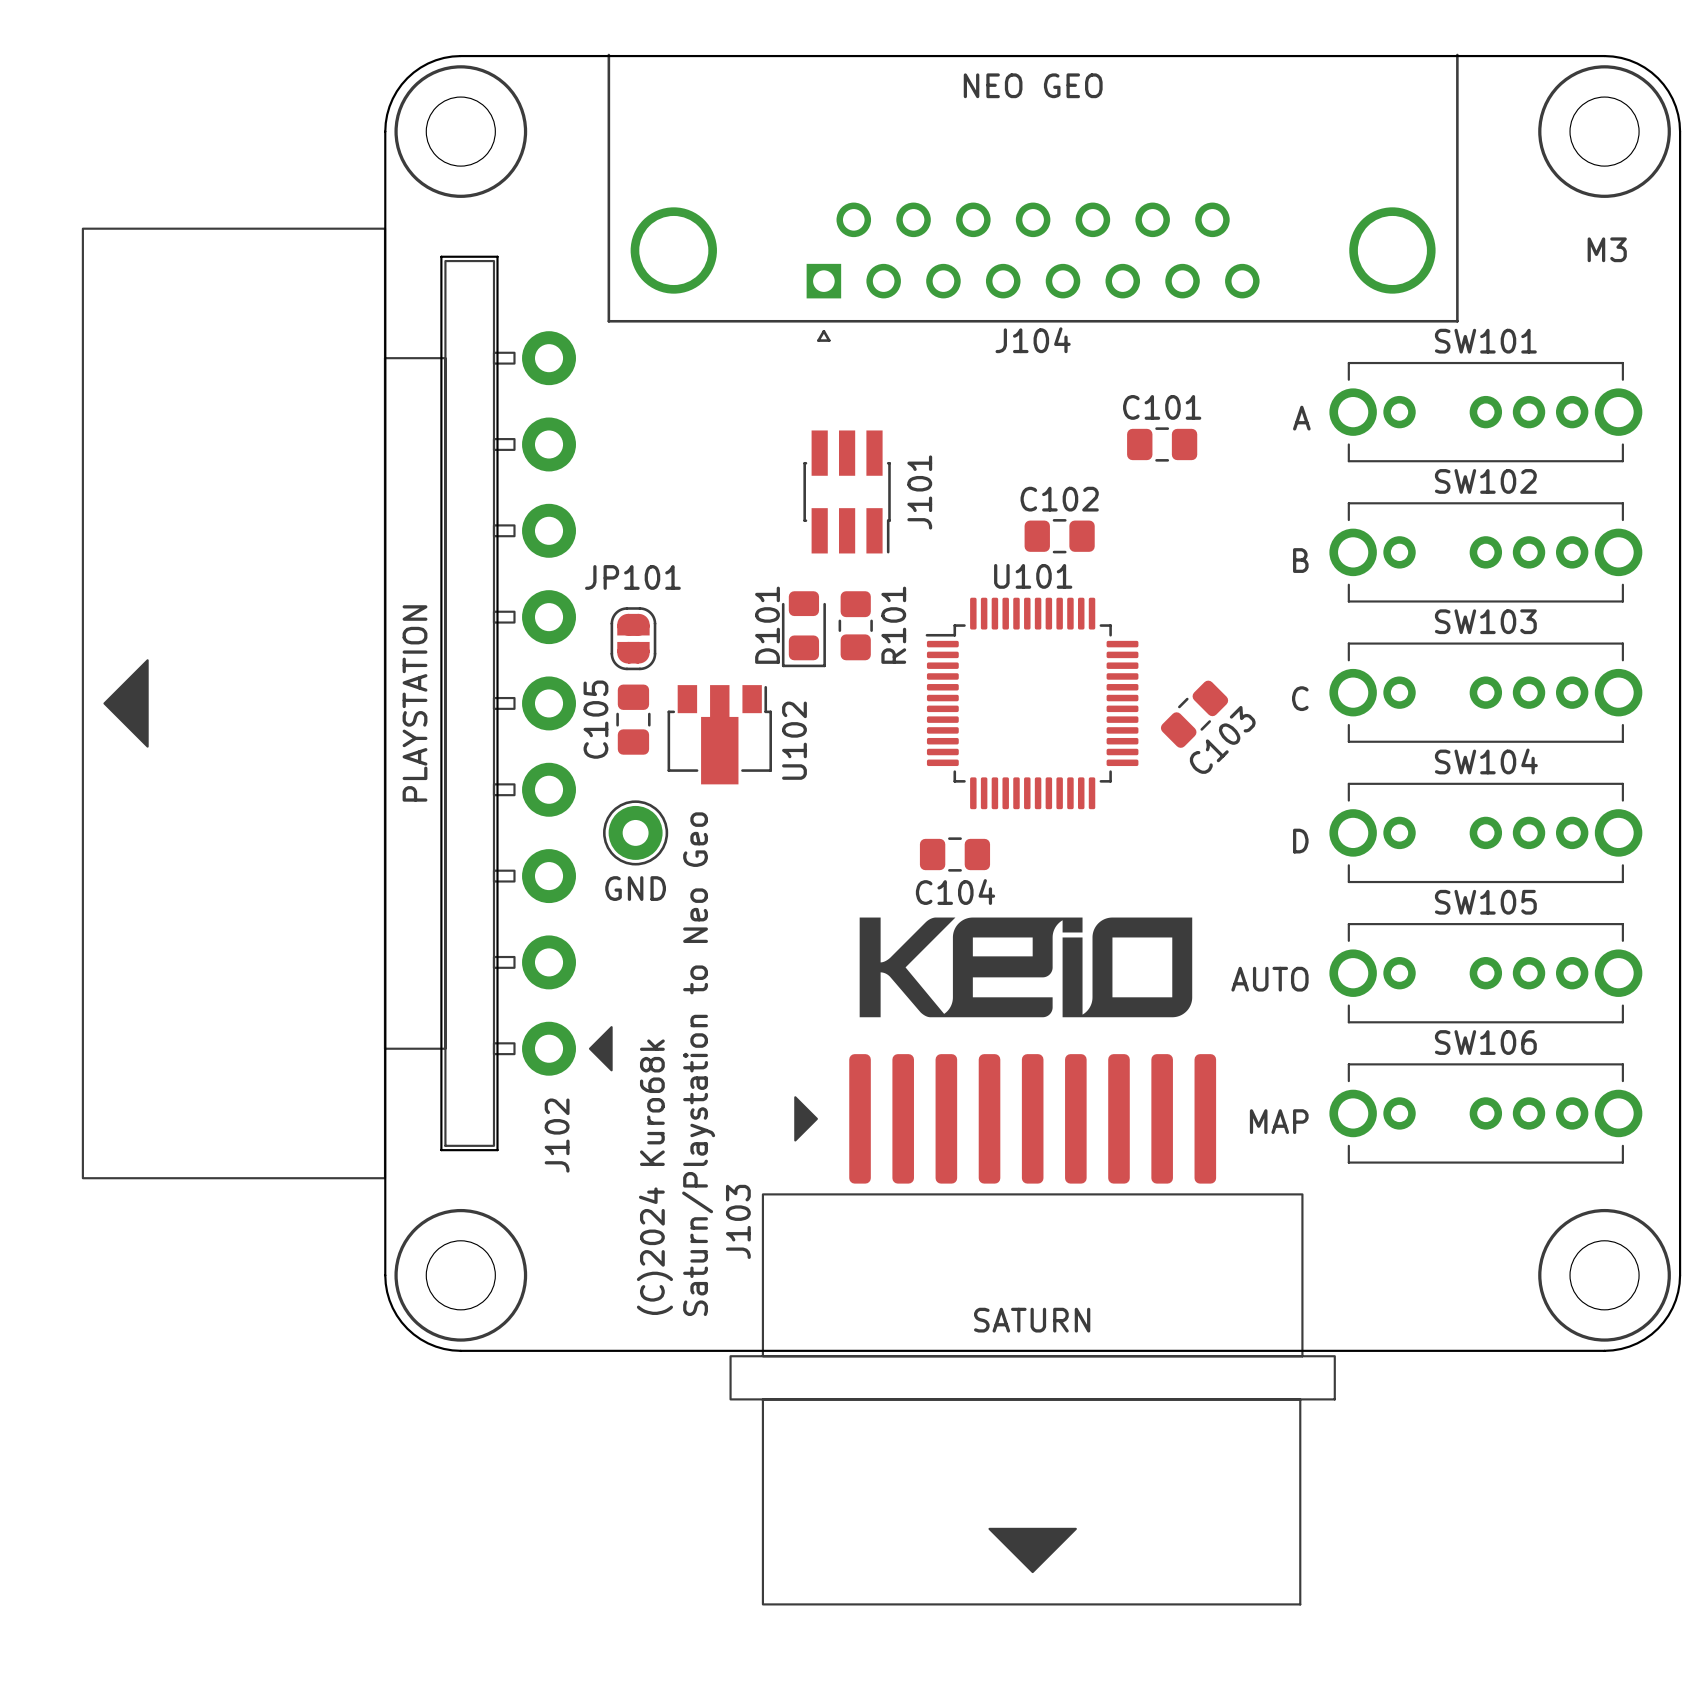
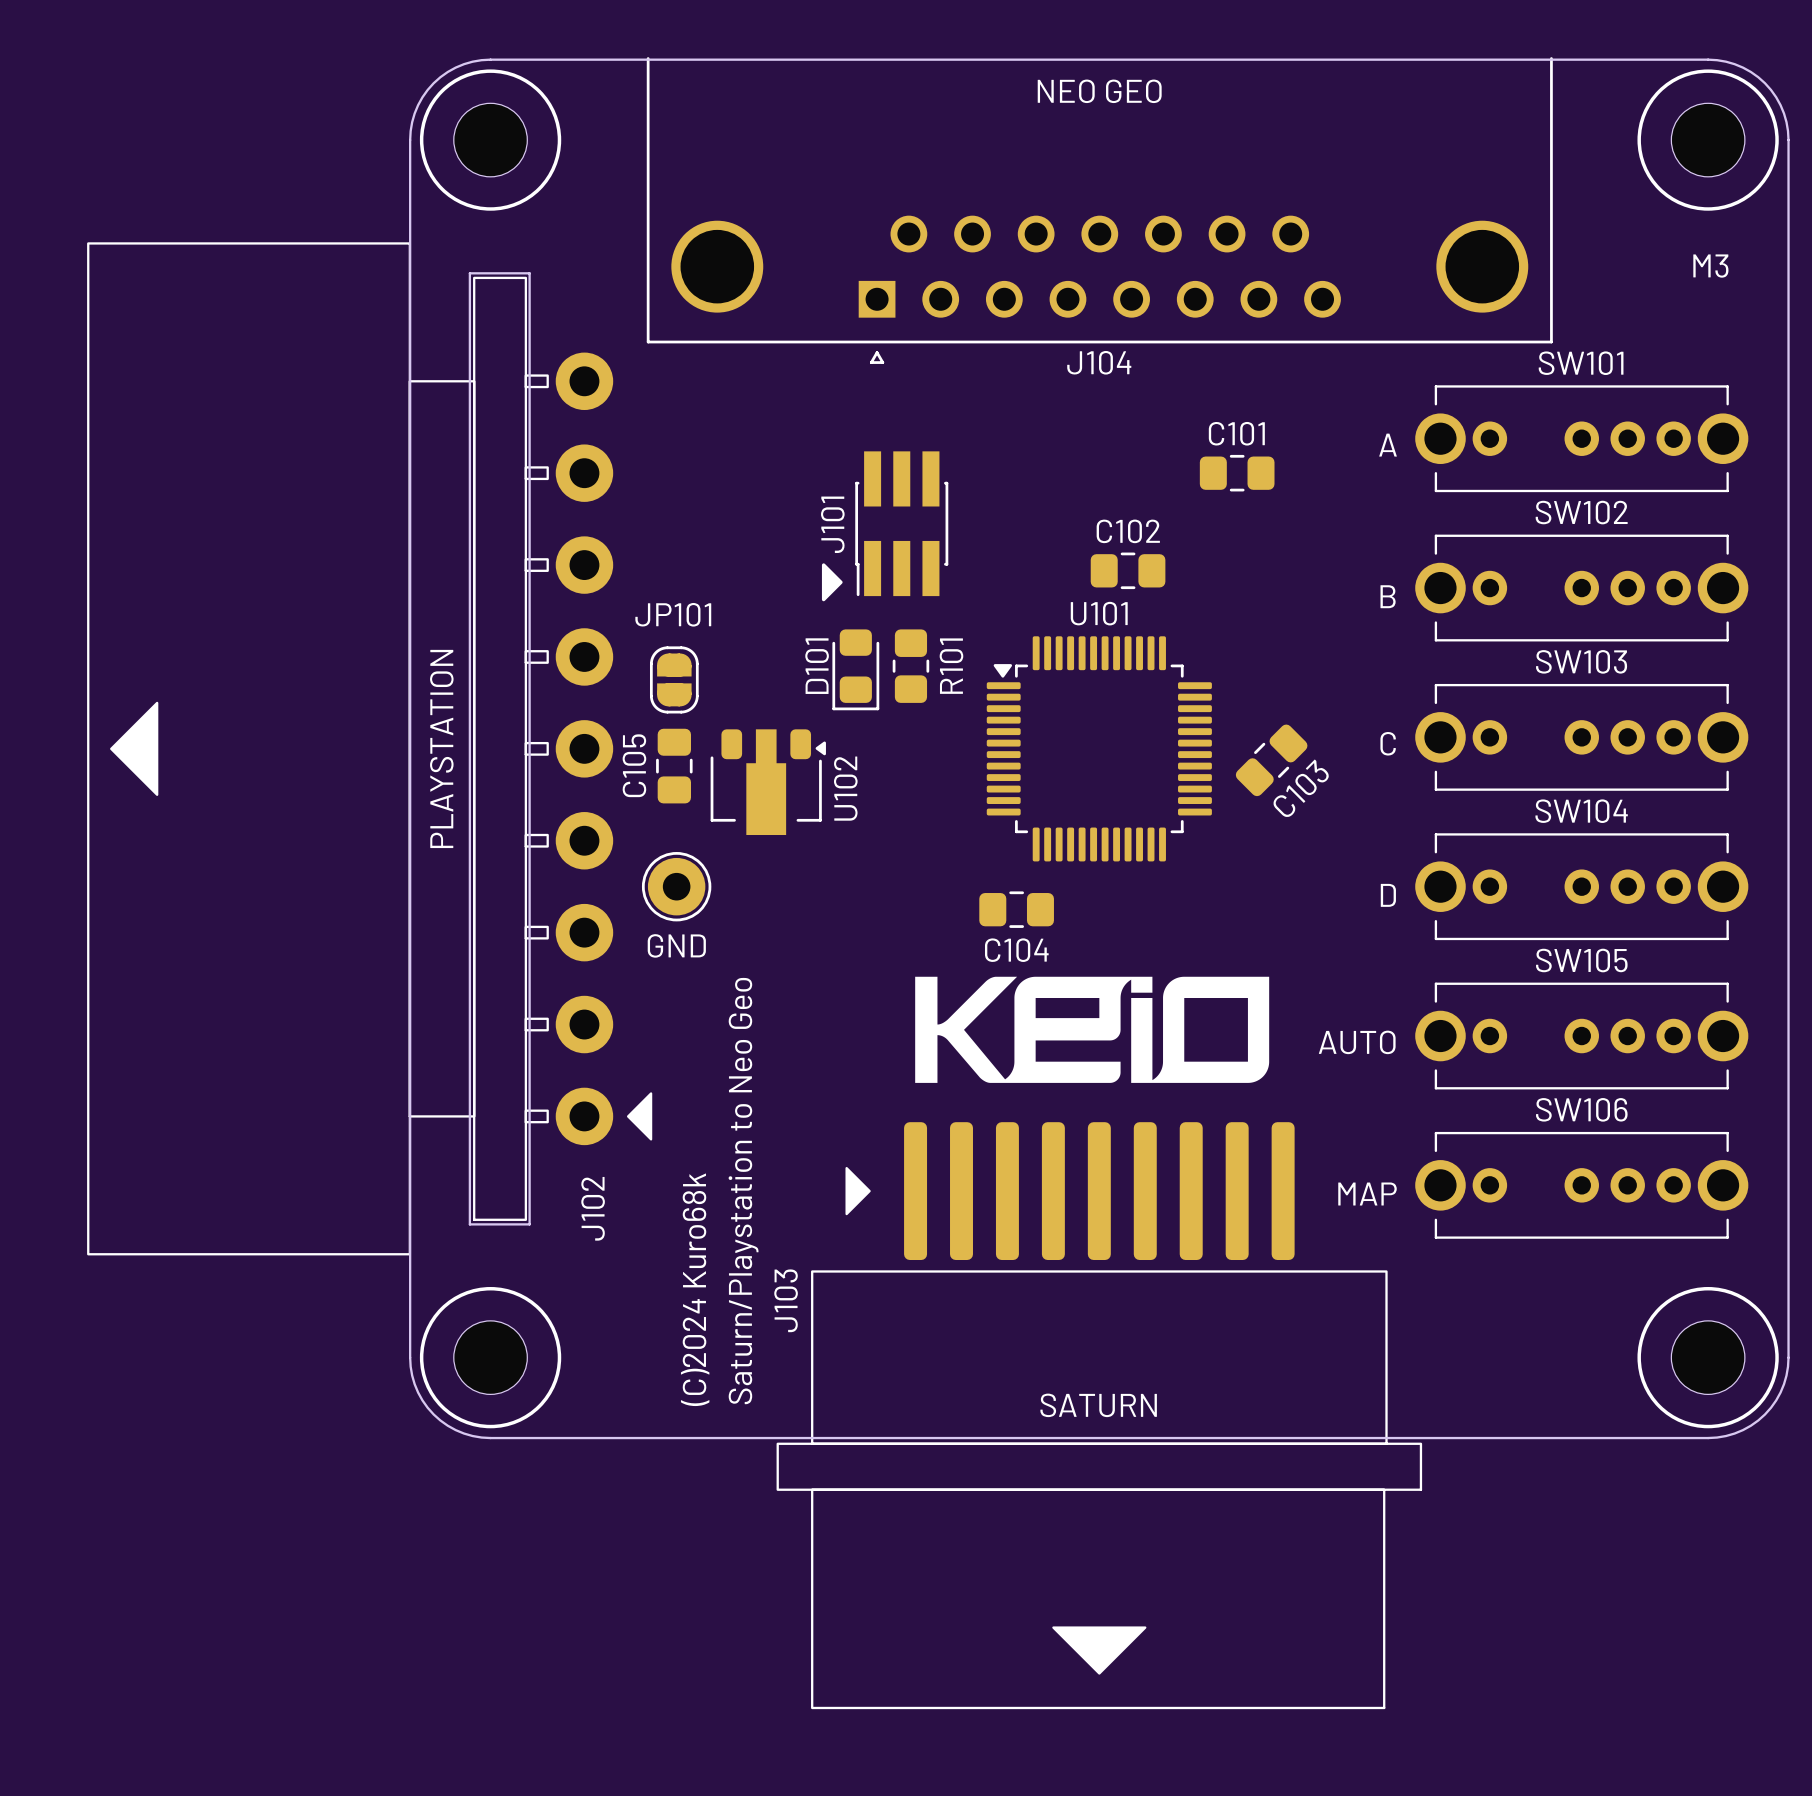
J101 footprint: [803, 430, 891, 554] -> [855, 451, 949, 597]
J101 name position: J101 (919, 492) -> J101 (832, 524)
drawing: none -> [821, 563, 843, 602]
U101 footprint: [925, 597, 1139, 810] -> [986, 636, 1212, 862]
U102 footprint: [667, 685, 772, 785] -> [710, 729, 826, 836]

